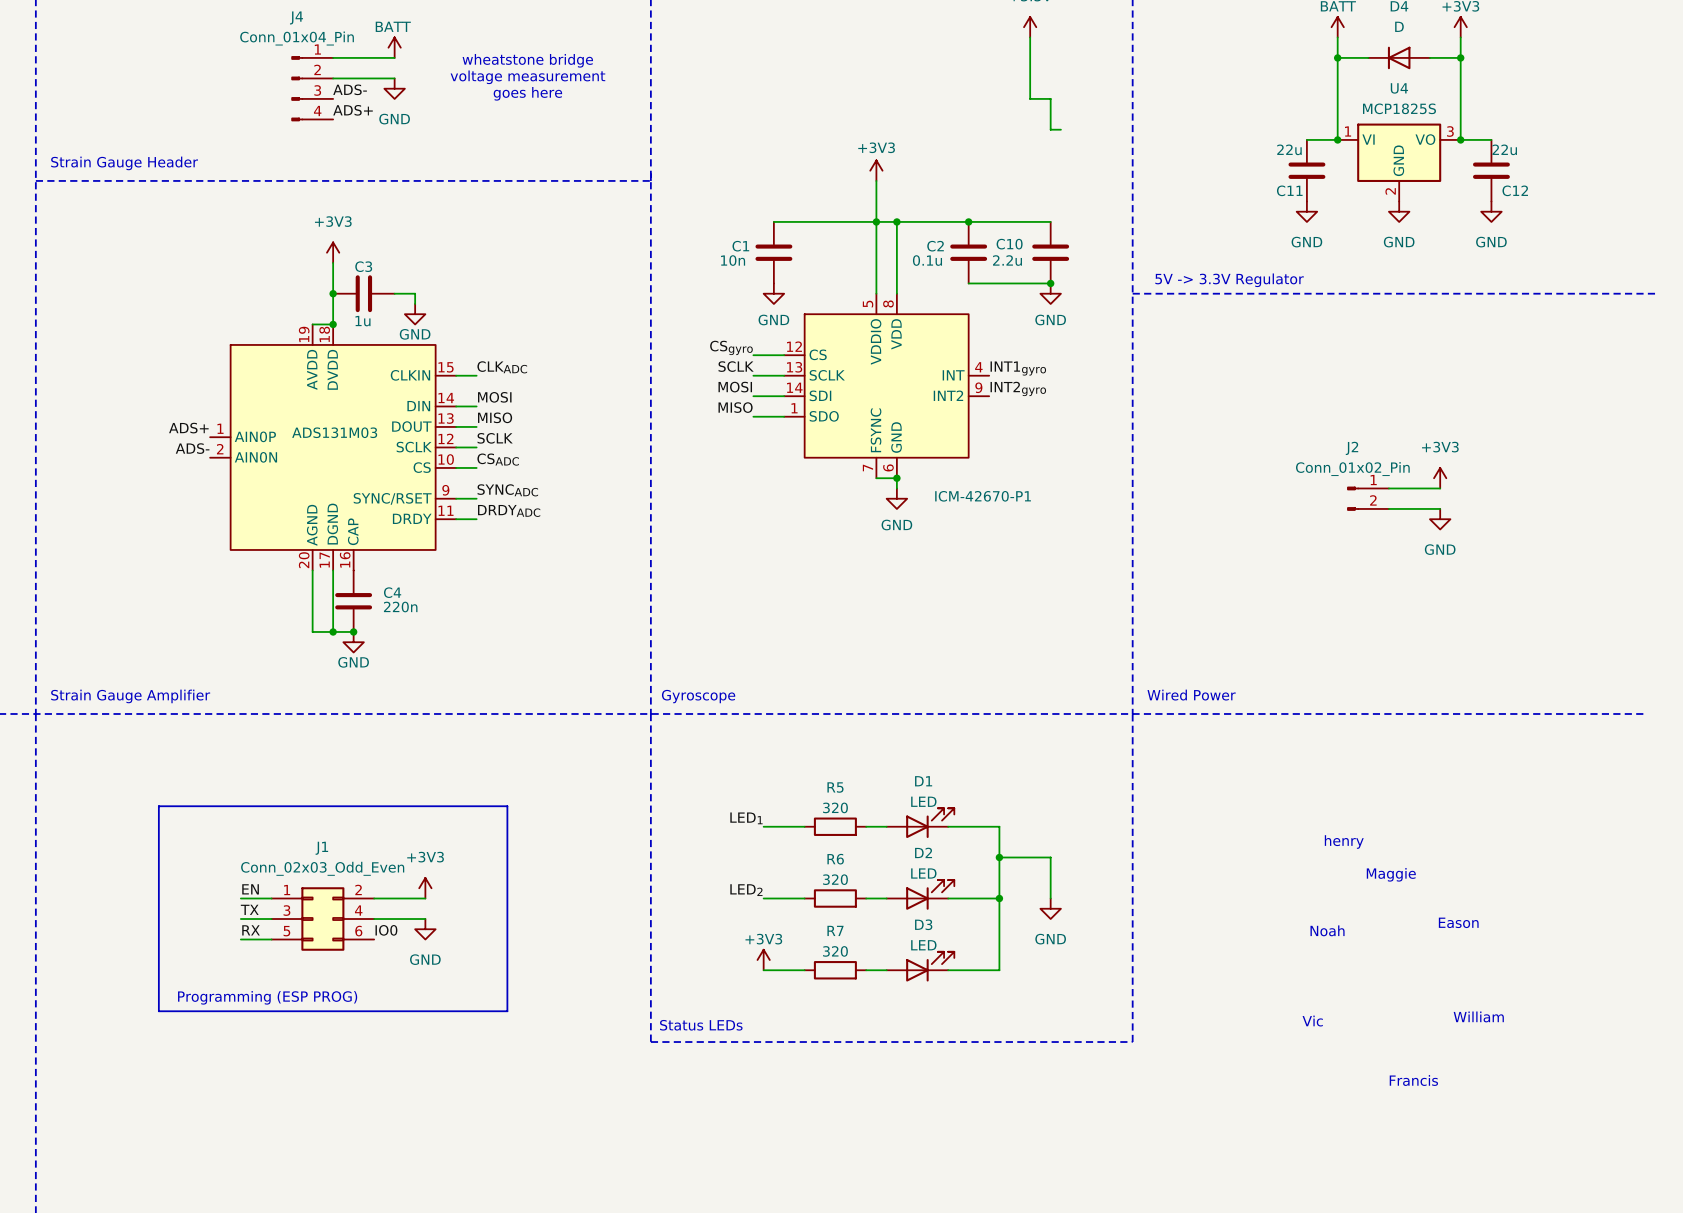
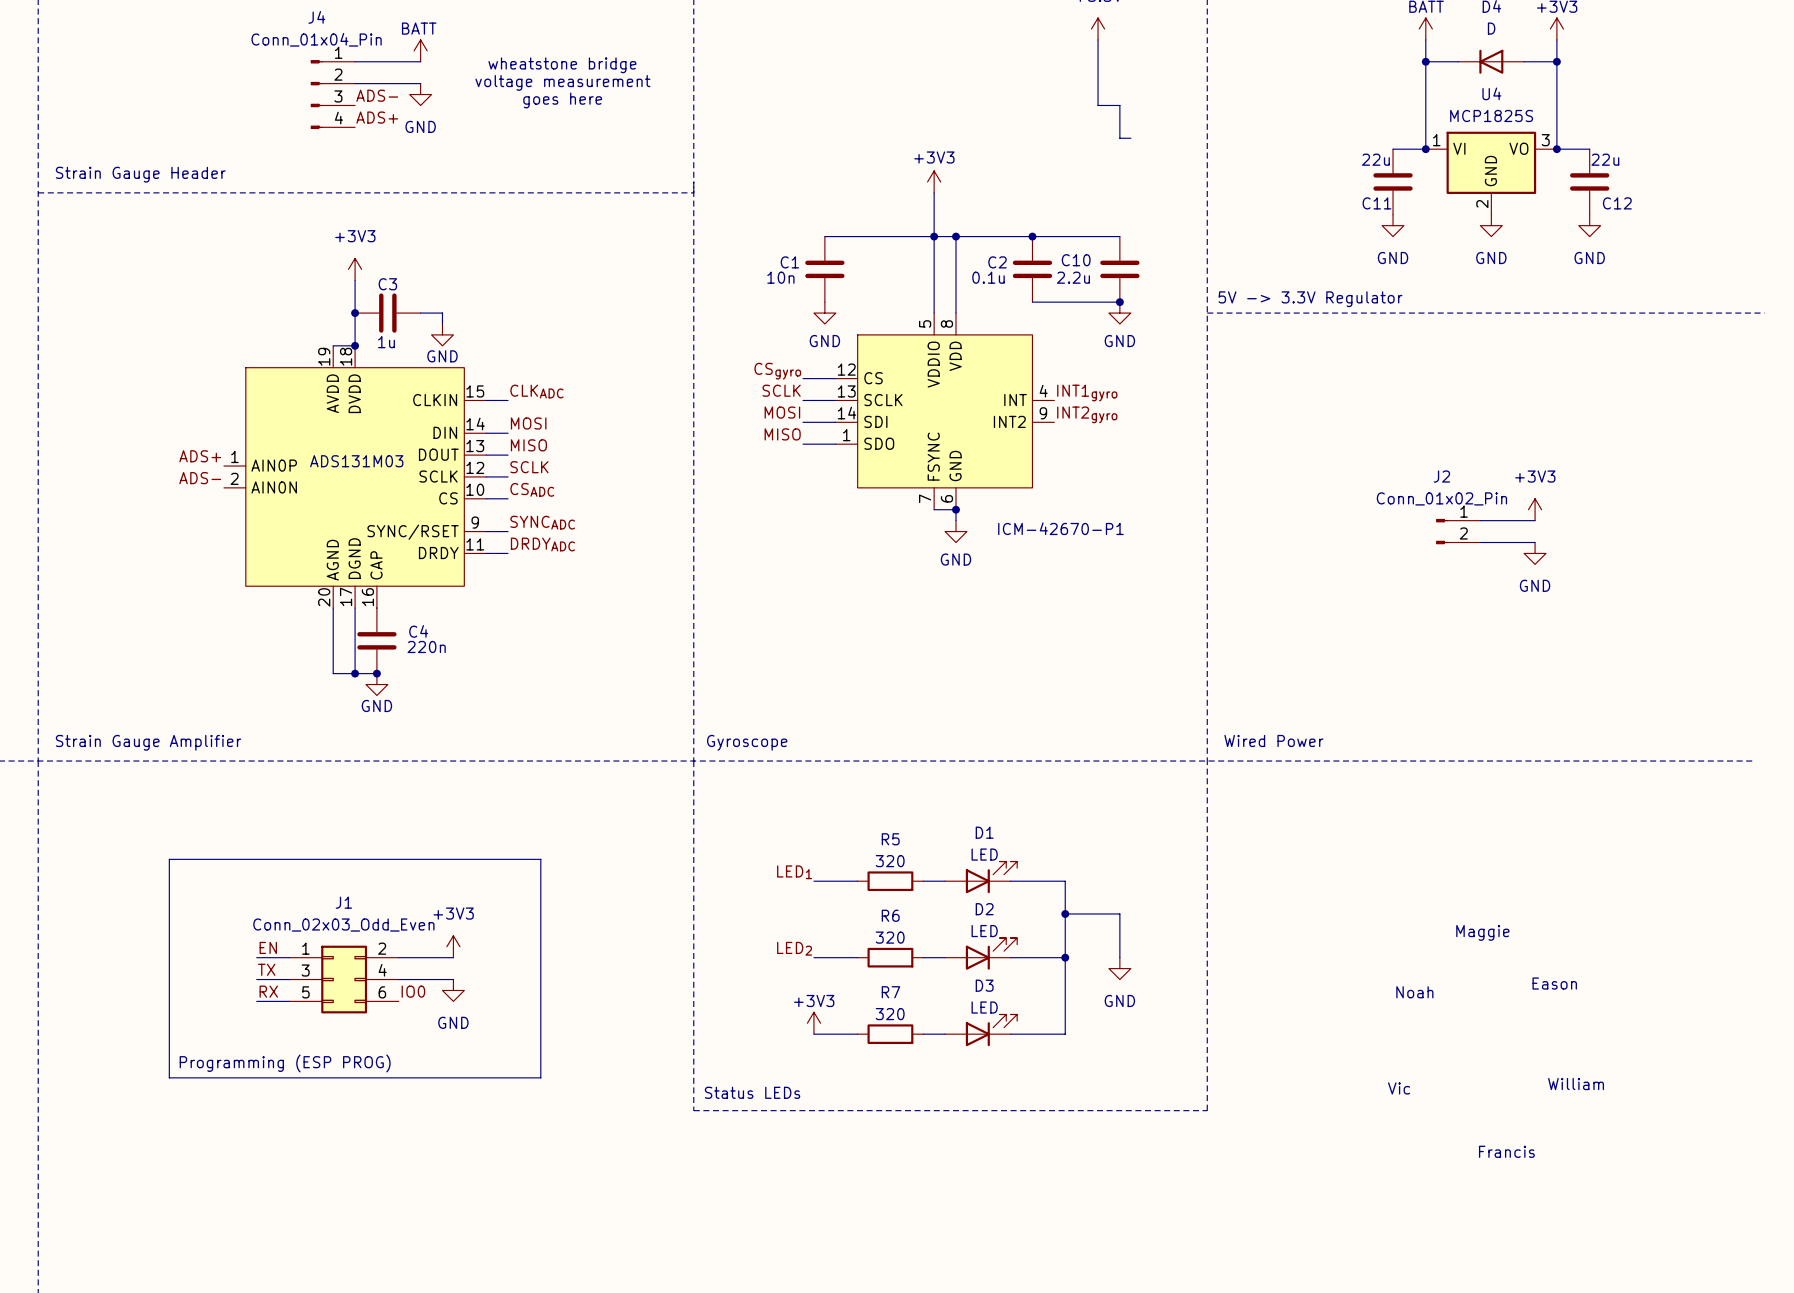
text: henry (1344, 841) -> none

